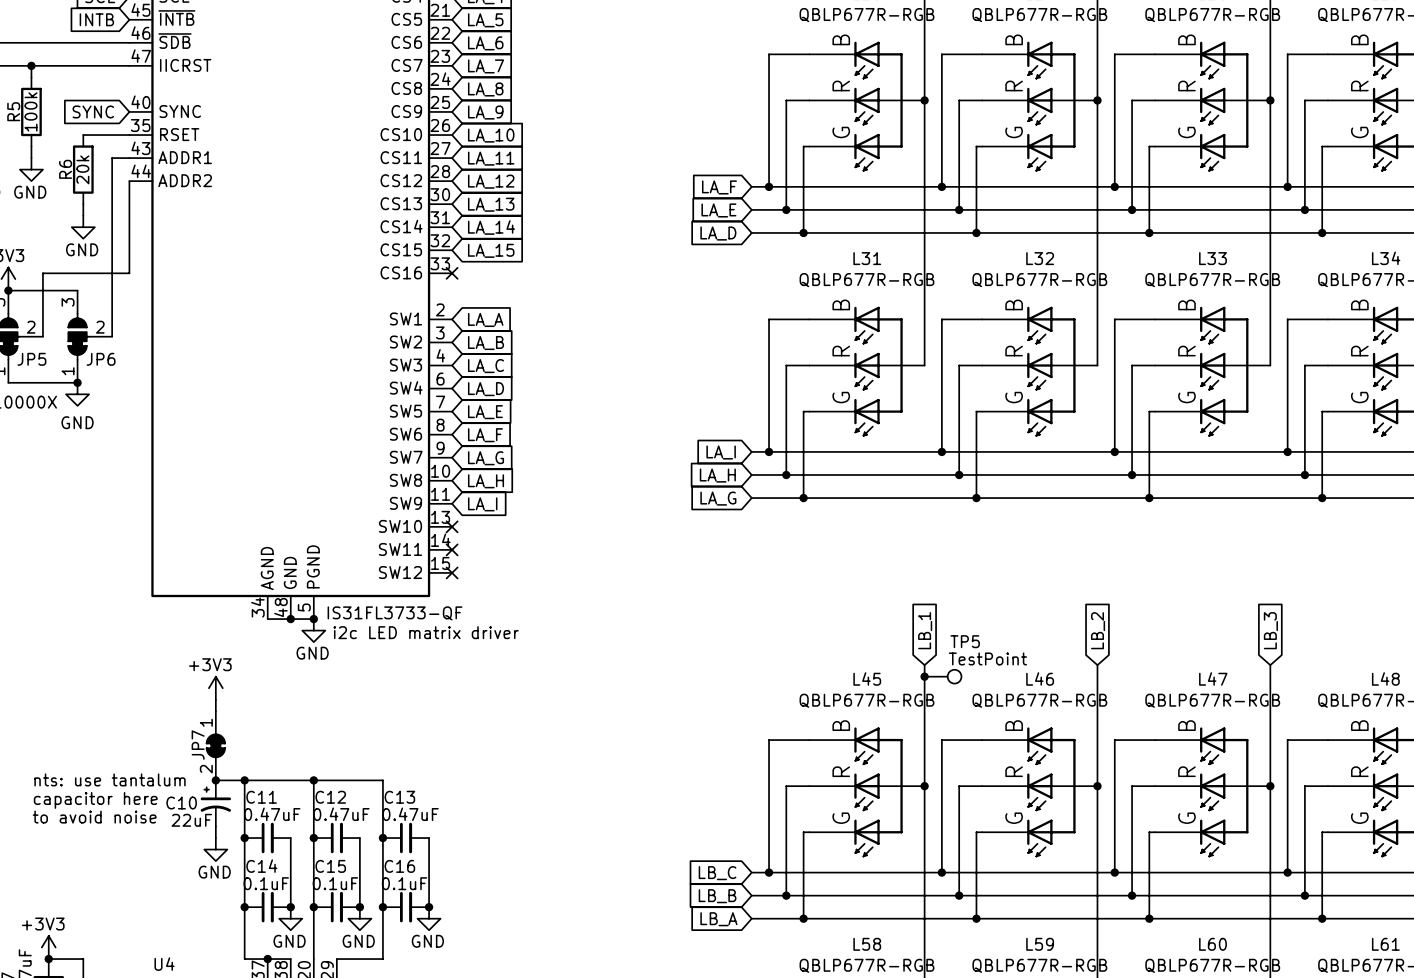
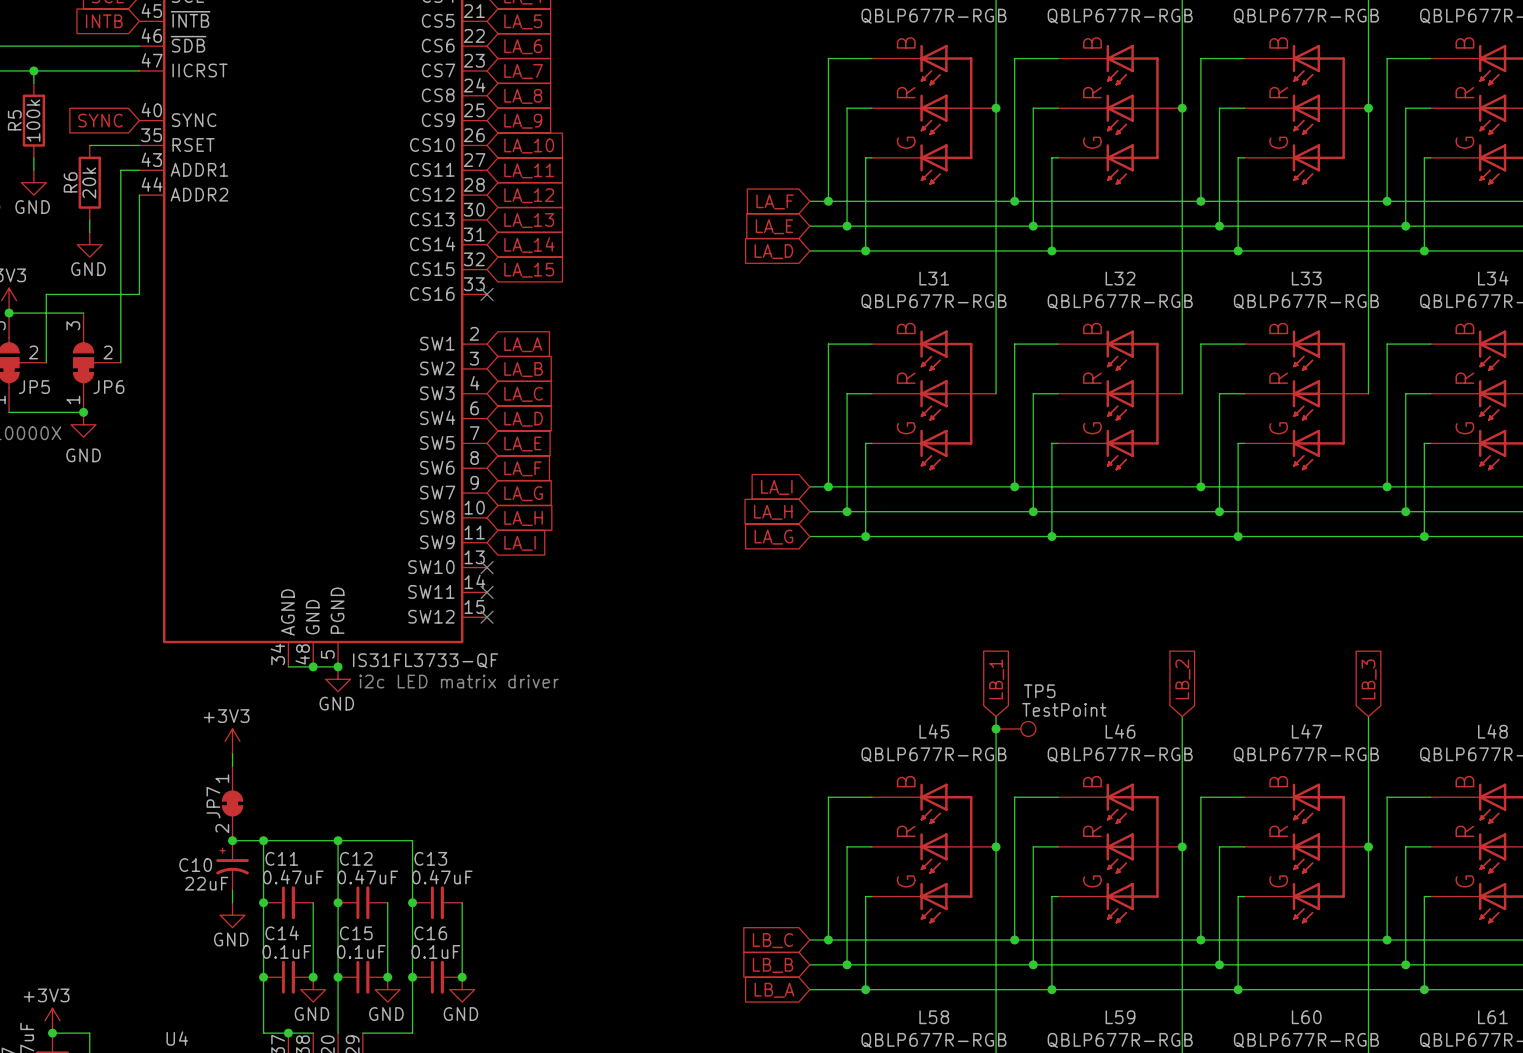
text: nts: use tantalum (110, 779) -> none
text: capacitor here (95, 800) -> none
text: to avoid noise (94, 817) -> none

